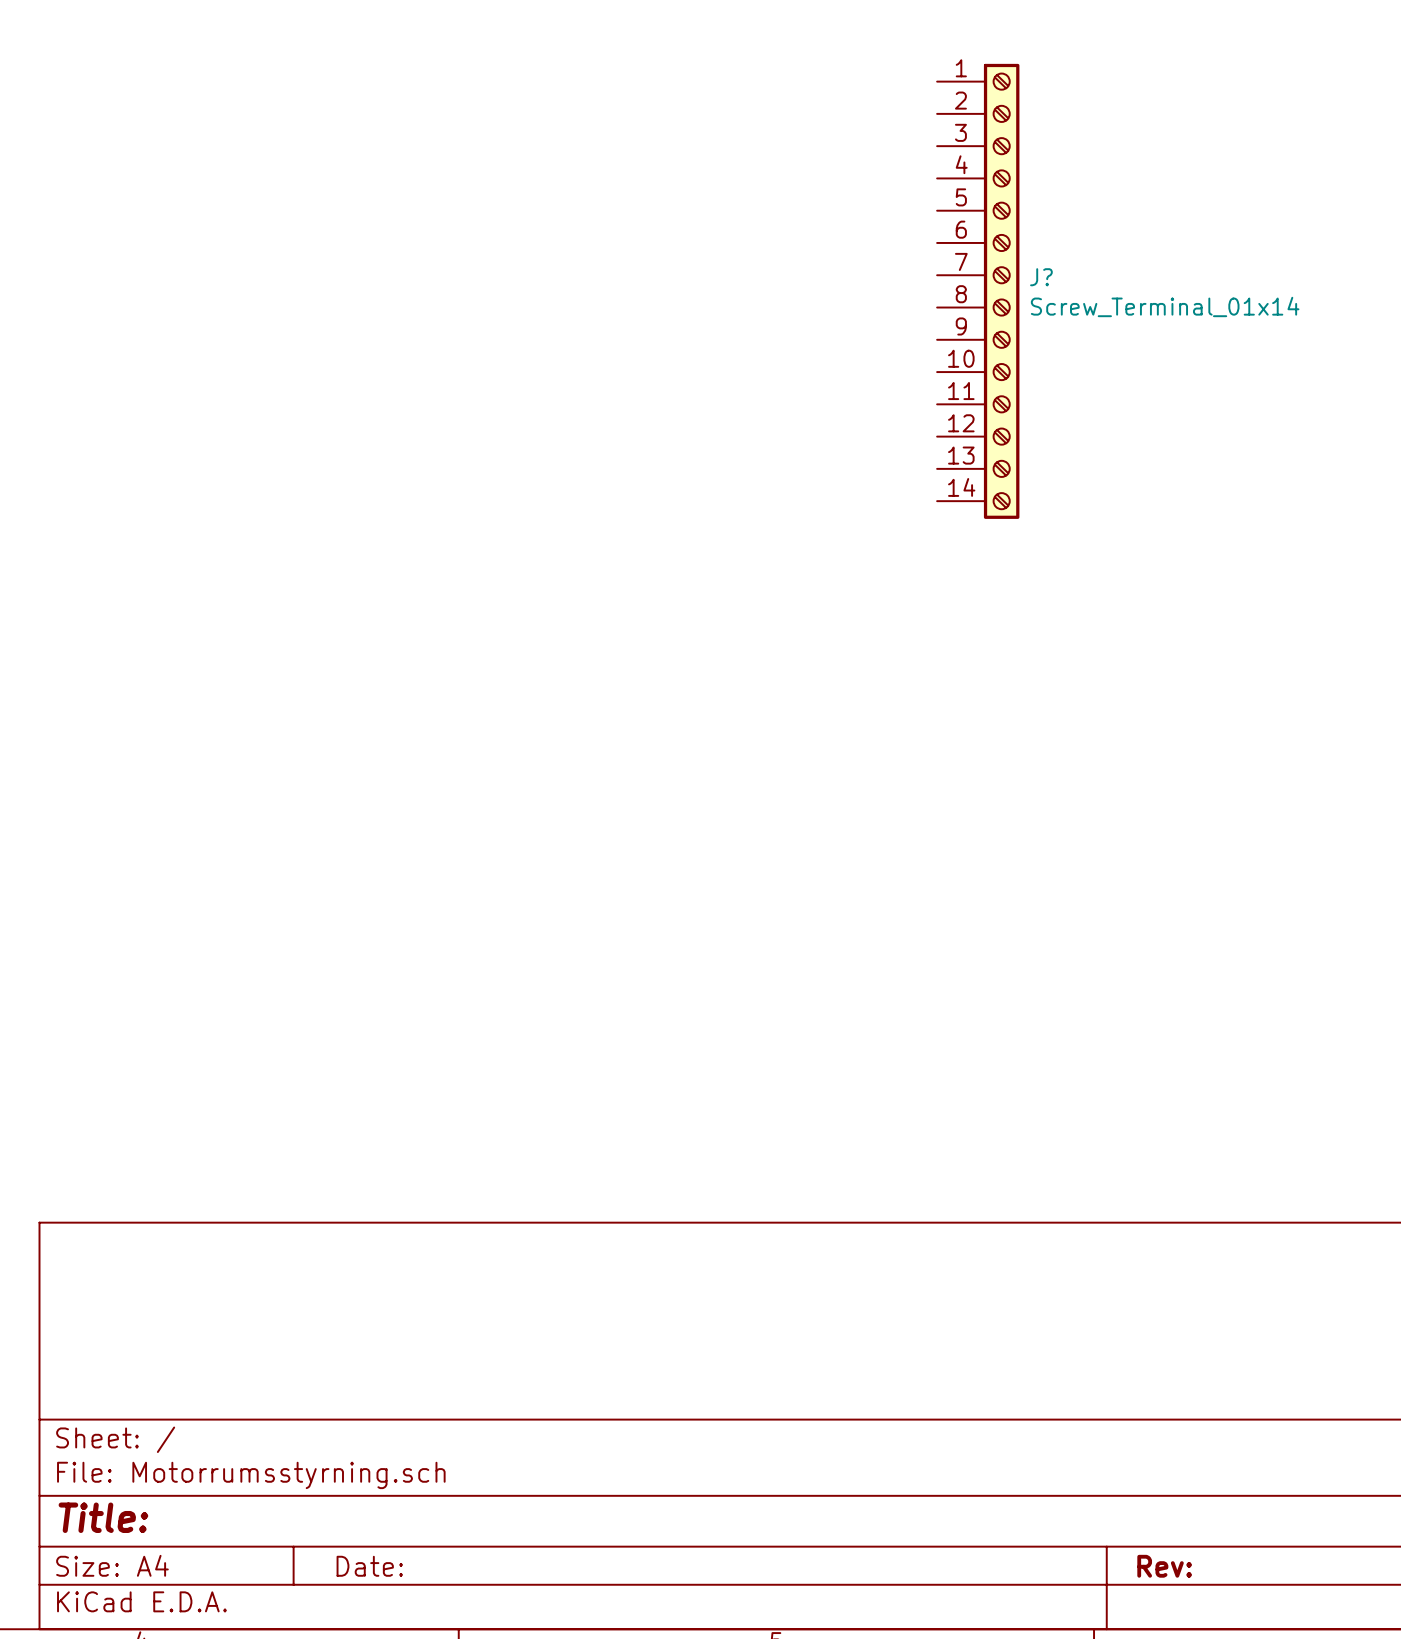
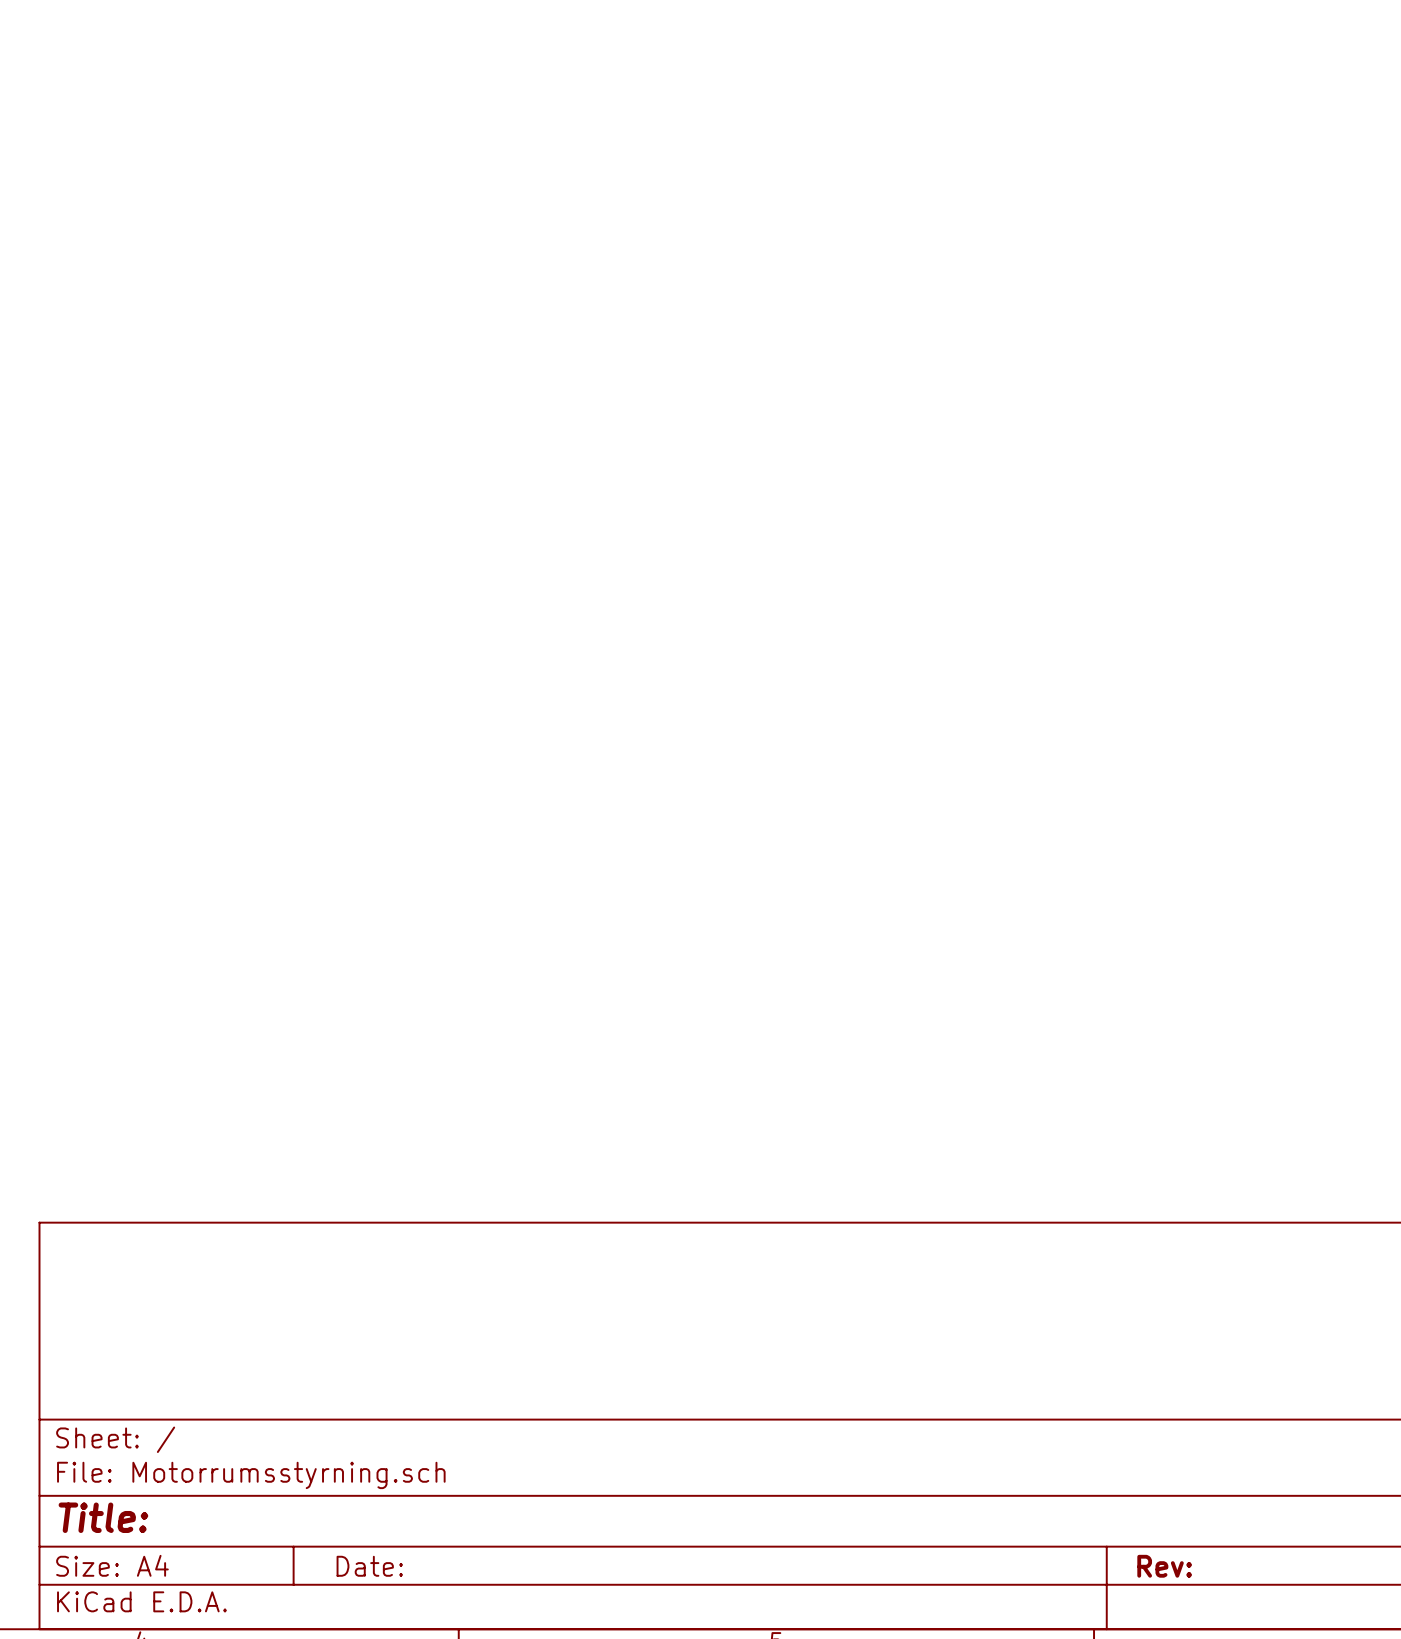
J?: Screw_Terminal_01x14 (978, 291) -> none

